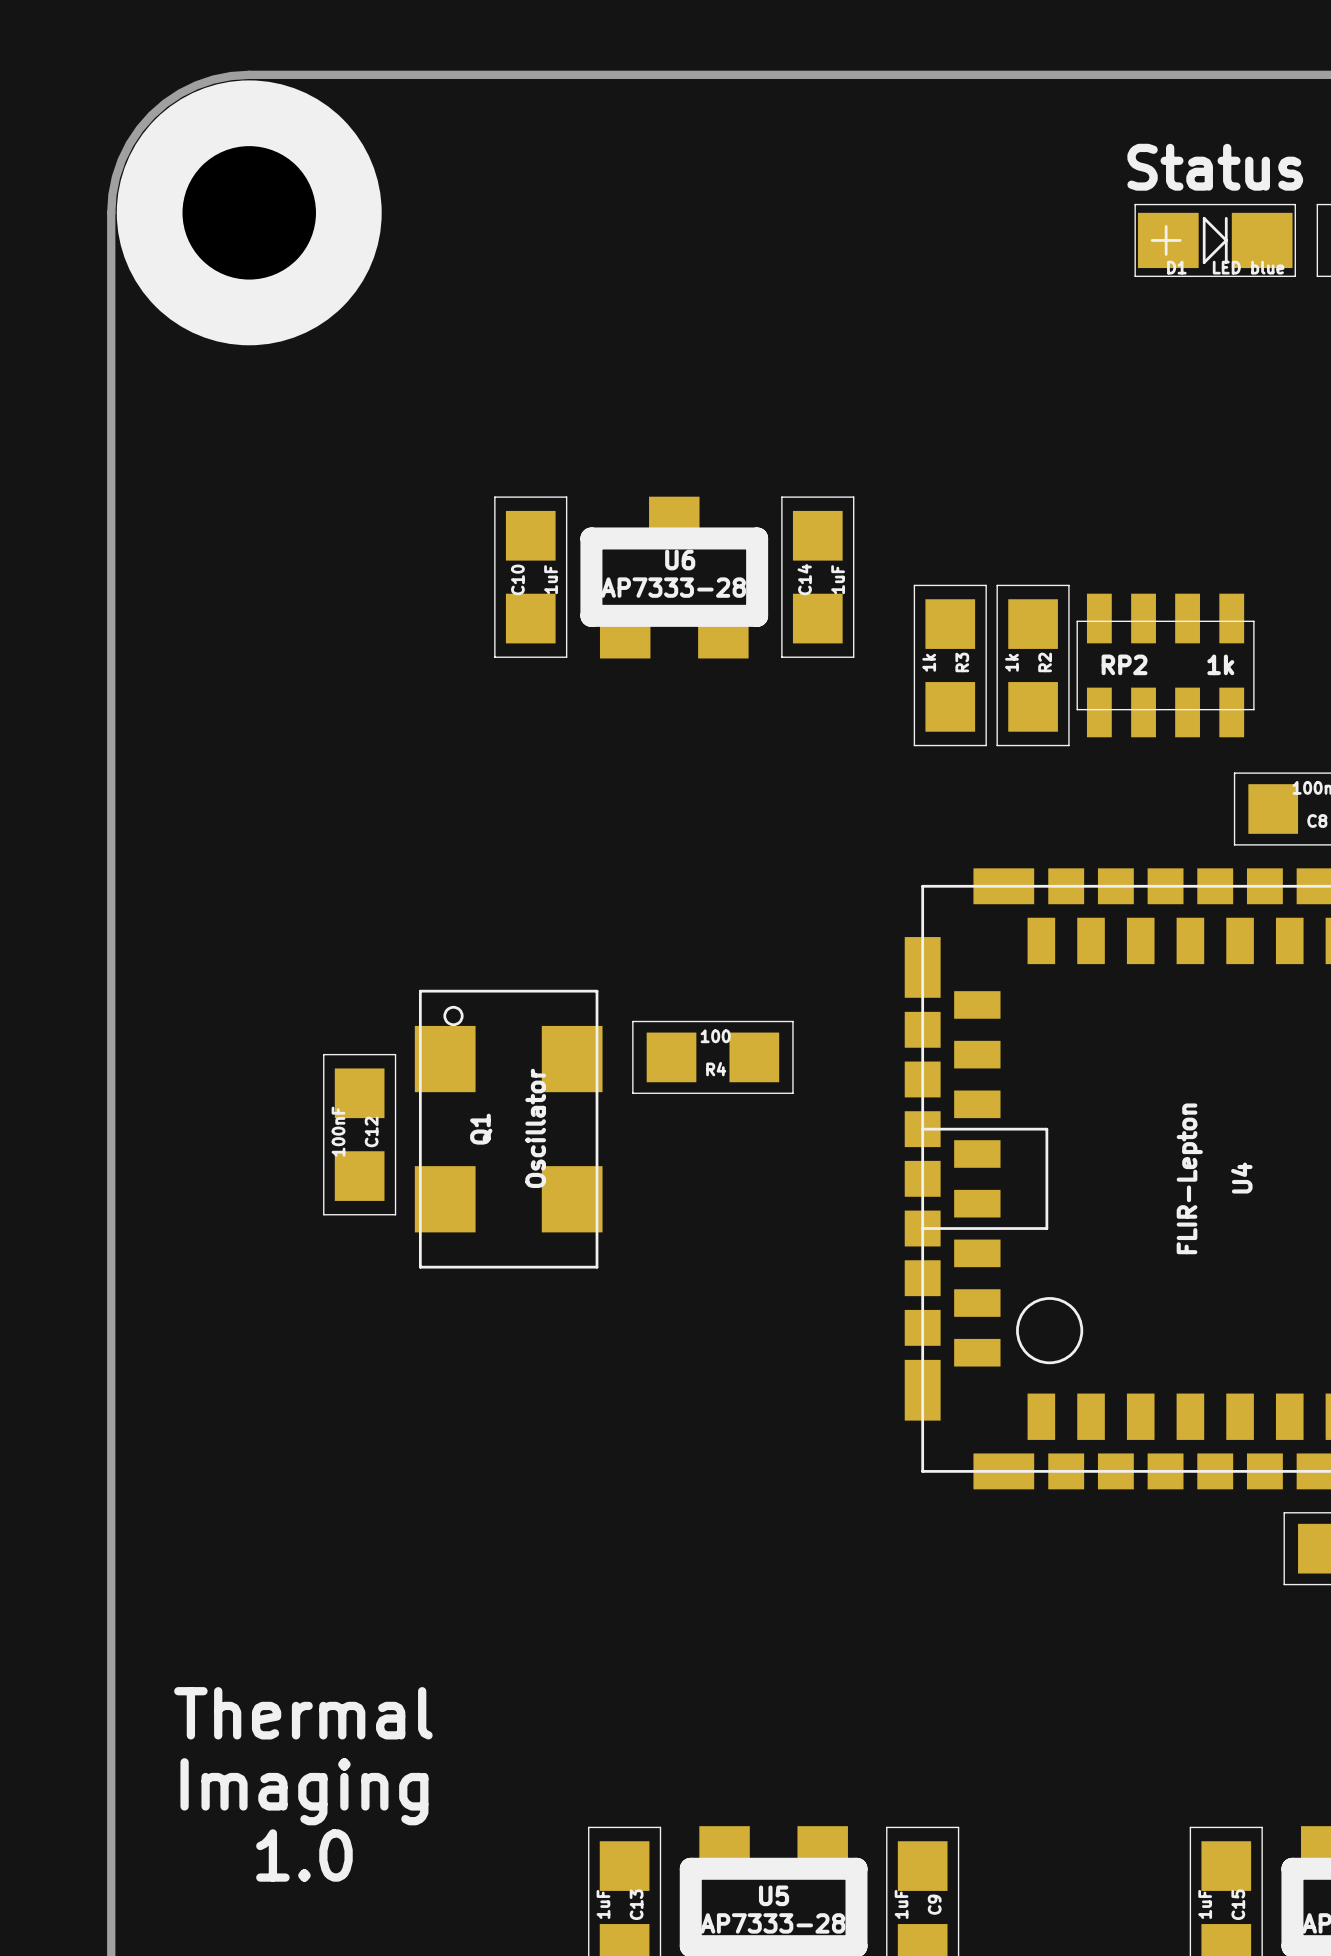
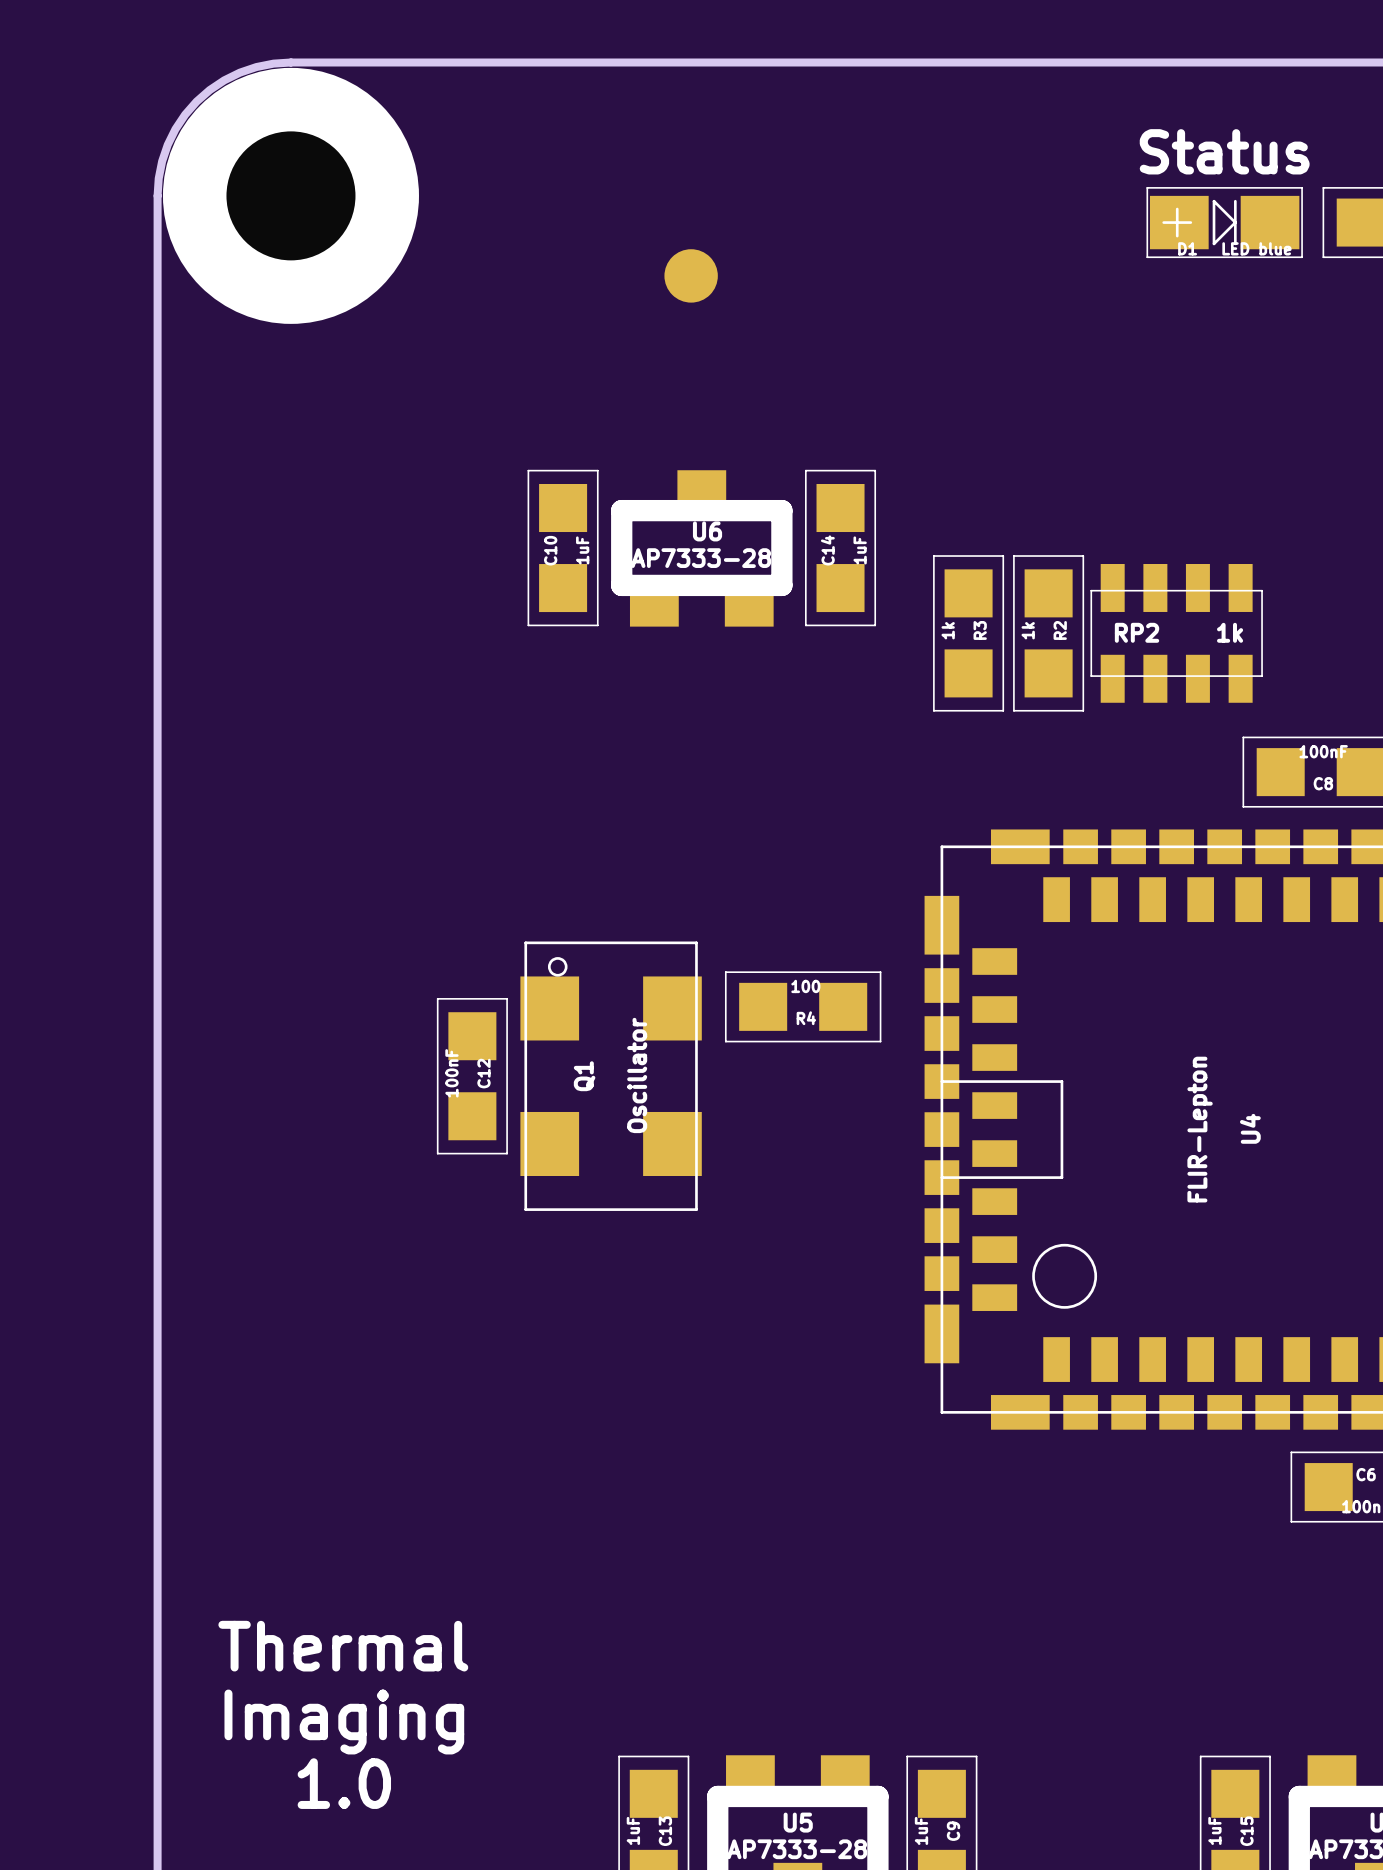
part: none -> (691, 275)
R4 position: (712, 1057) -> (803, 1006)
Q1 position: (508, 1129) -> (611, 1076)
C12 position: (359, 1134) -> (472, 1076)

